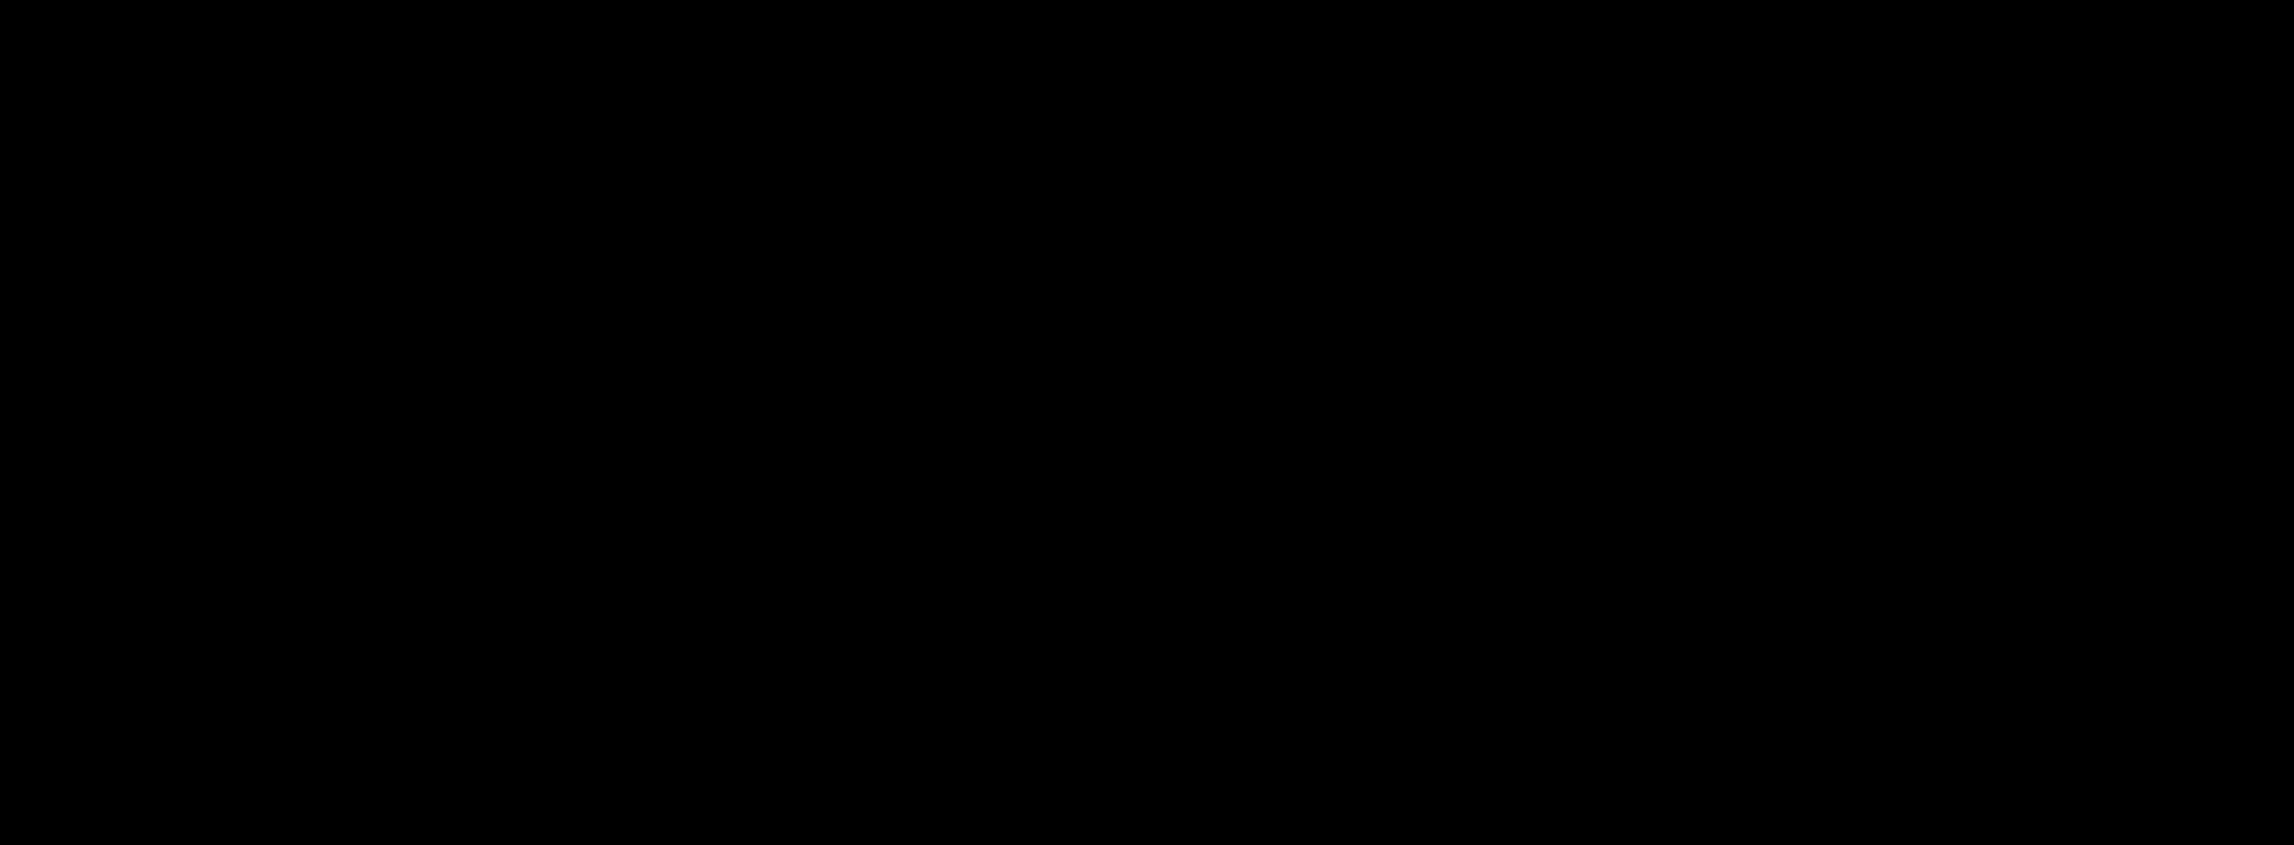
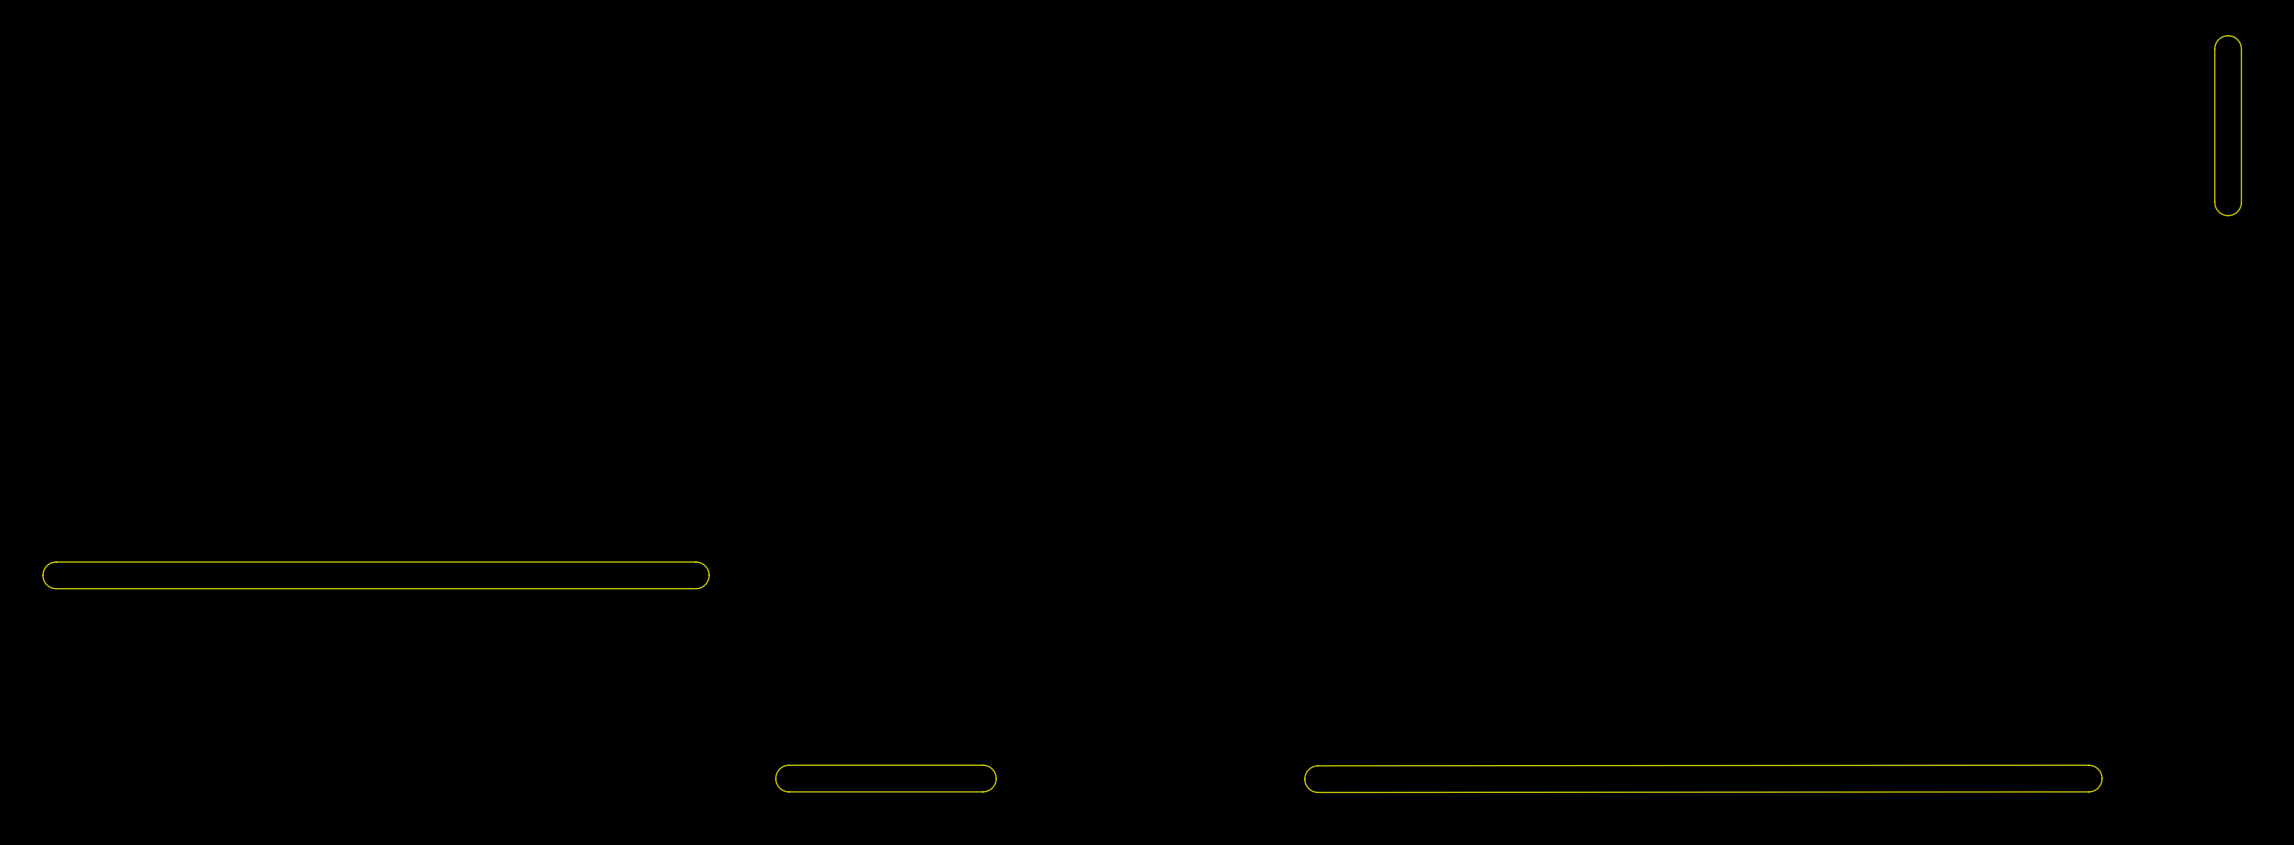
board edge: none -> (2228, 35) (2218, 39) (2214, 49) (2214, 203) (2218, 211) (2228, 215) (2237, 211) (2241, 202) (2241, 47) (2237, 39) (2228, 35)
board edge: none -> (56, 562) (695, 562) (705, 565) (709, 575) (705, 584) (695, 588) (56, 588) (46, 584) (42, 575) (46, 565) (56, 562)
board edge: none -> (789, 765) (984, 765) (993, 770) (996, 780) (992, 787) (984, 791) (787, 791) (779, 787) (775, 778) (779, 769) (789, 765)
board edge: none -> (2088, 765) (1318, 765) (1308, 769) (1304, 779) (1308, 788) (1318, 792) (2088, 791) (2098, 787) (2102, 778) (2098, 769) (2088, 765)

